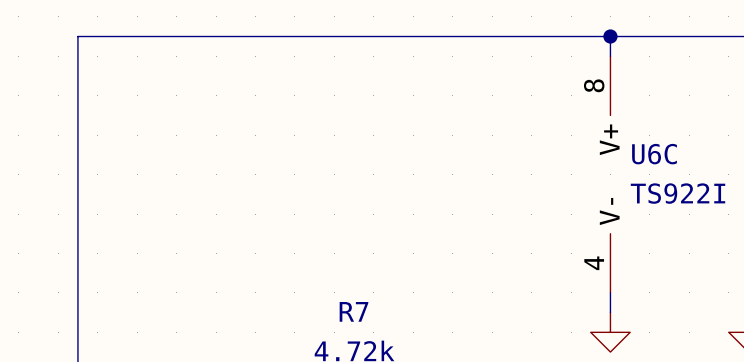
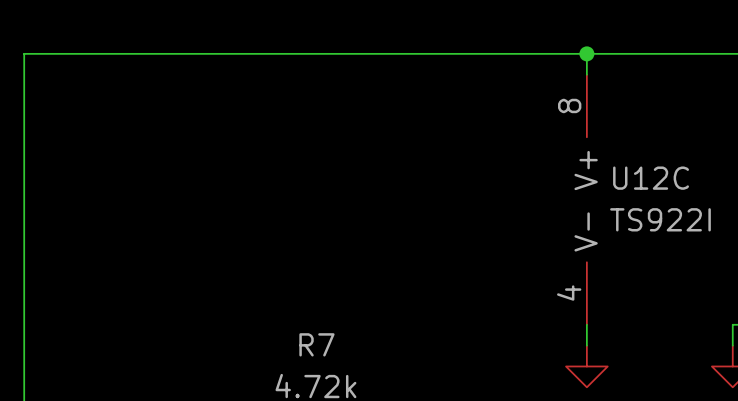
U6C name: U6C (654, 154) -> U12C (651, 178)

